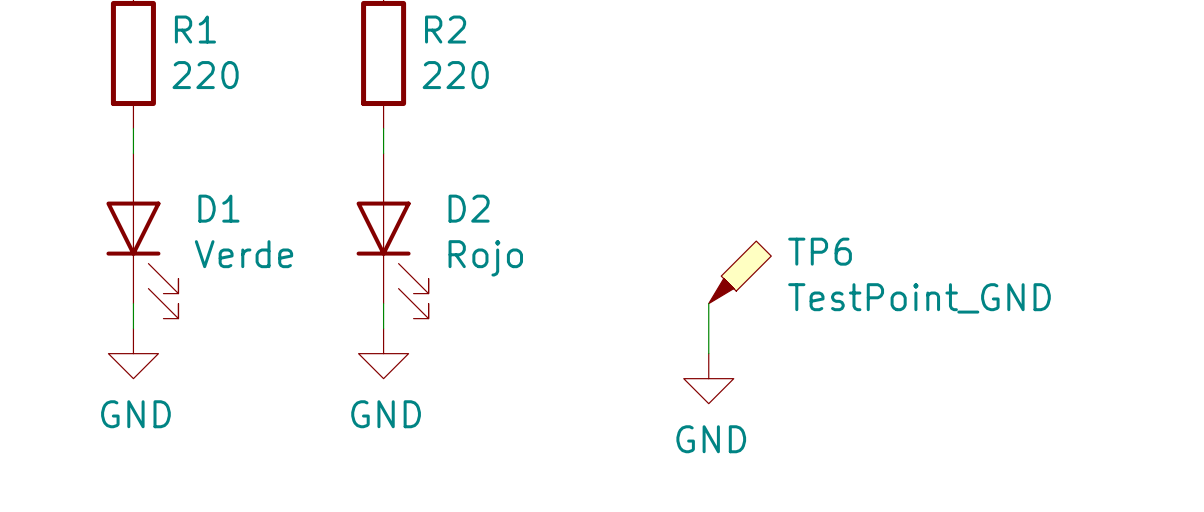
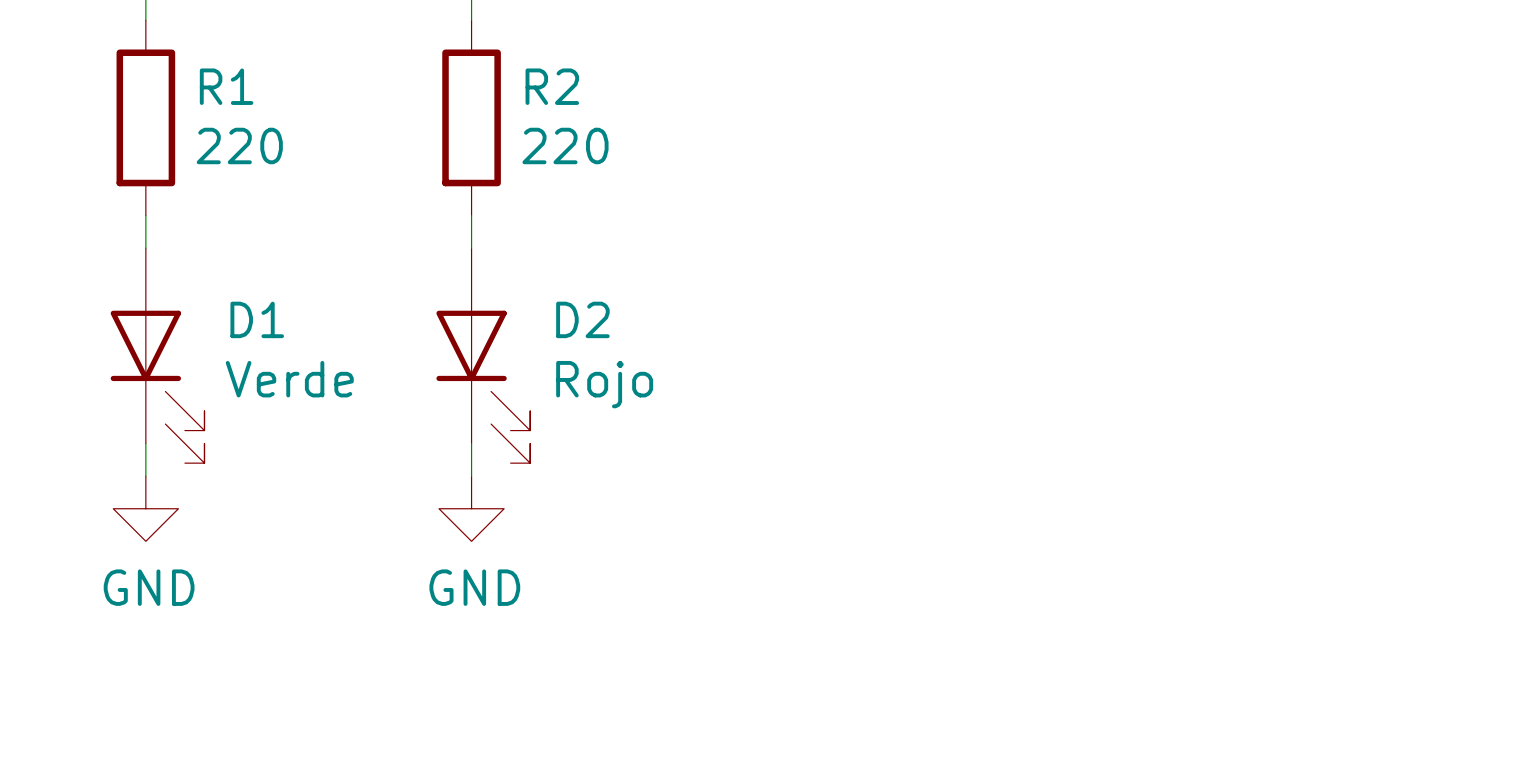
TP6: TestPoint_GND (740, 272) -> none
wire: (708, 303) (708, 353) -> none
power symbol: GND (708, 378) -> none

